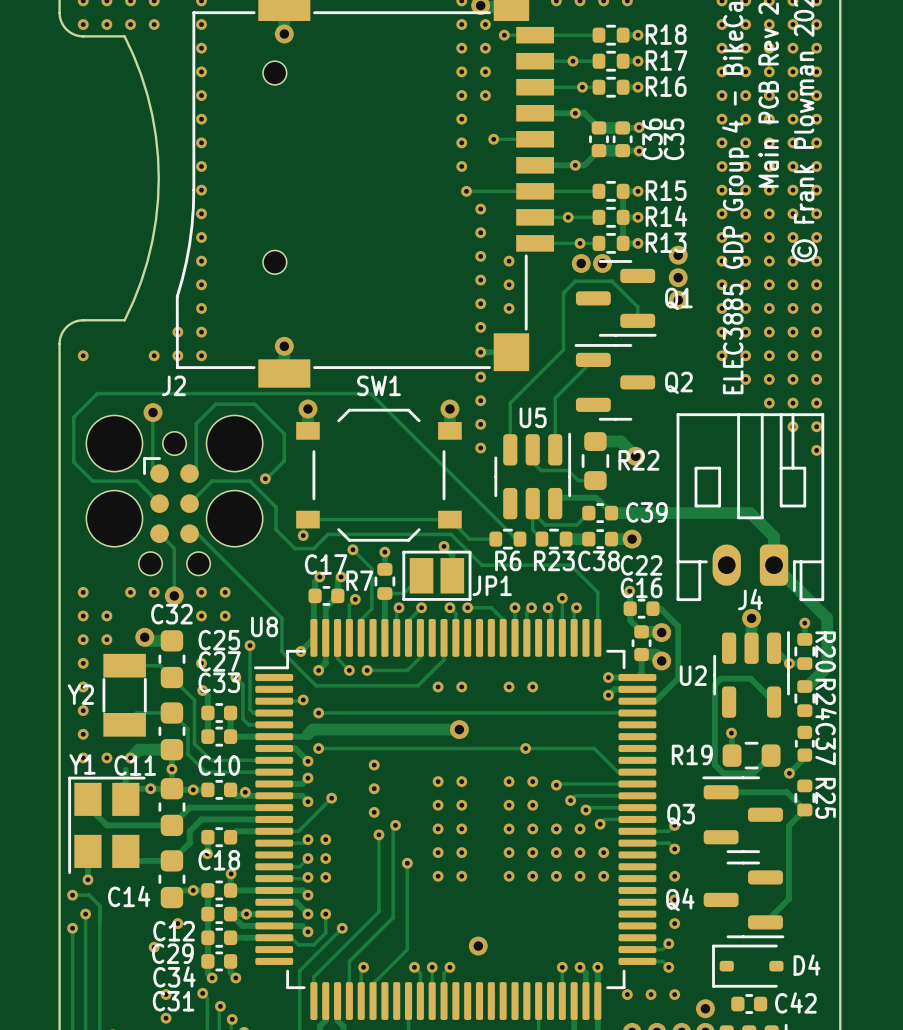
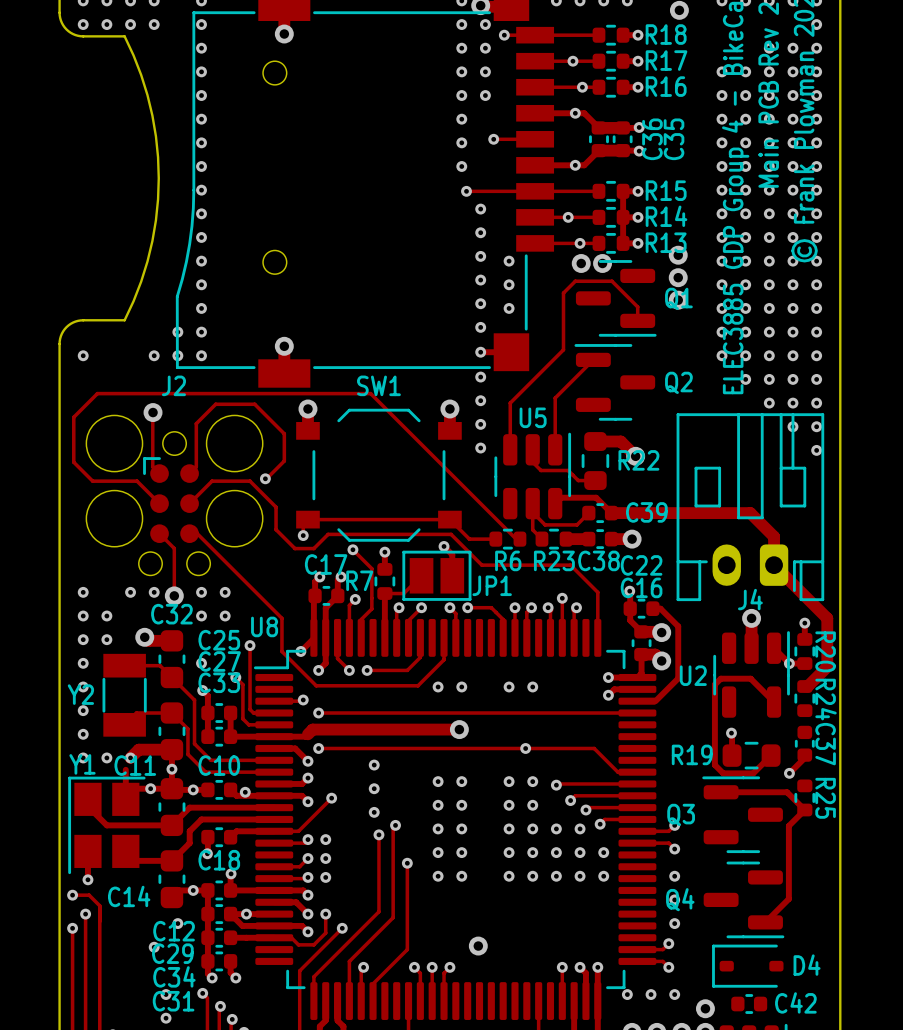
via: none -> (679, 10)
via: (722, 24) -> none
via: (745, 24) -> none
via: (769, 24) -> none
via: (792, 24) -> none
via: (722, 48) -> none
via: (745, 48) -> none

